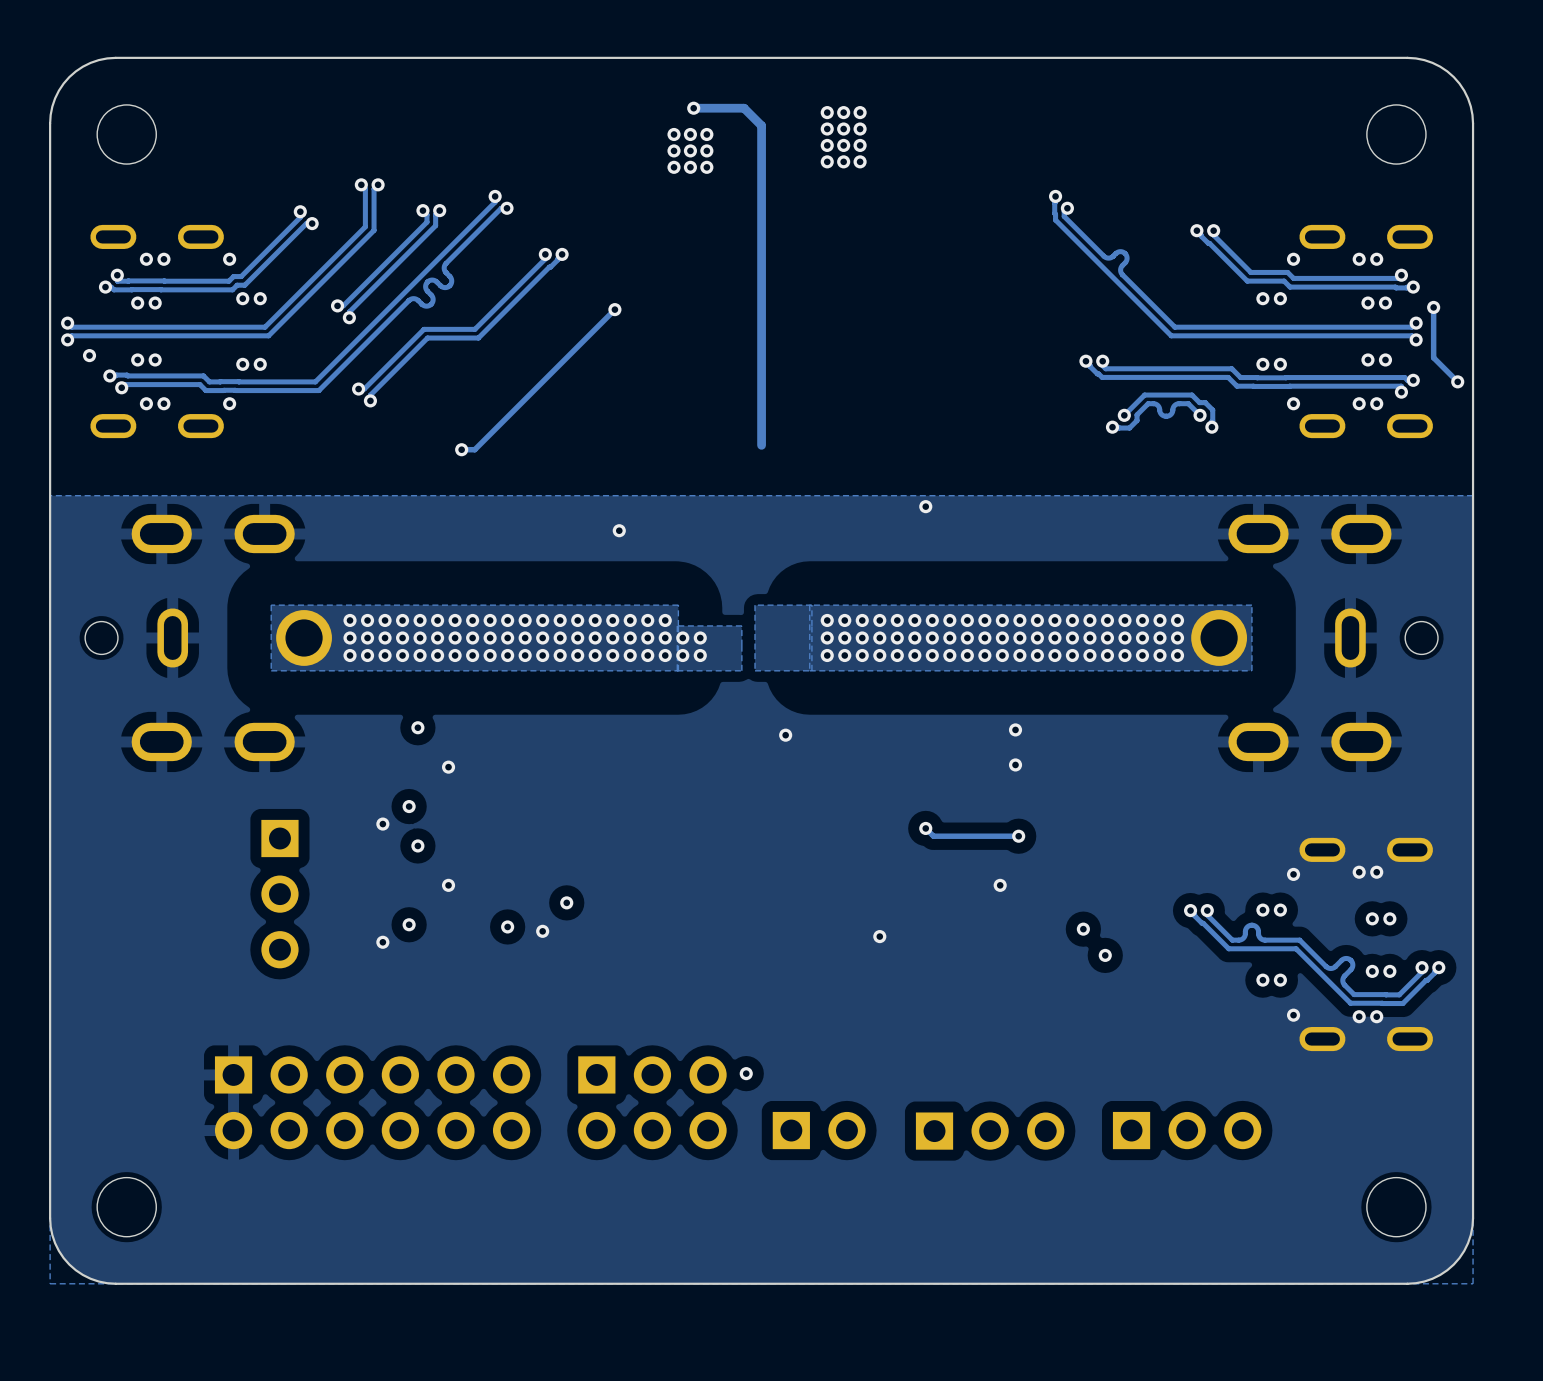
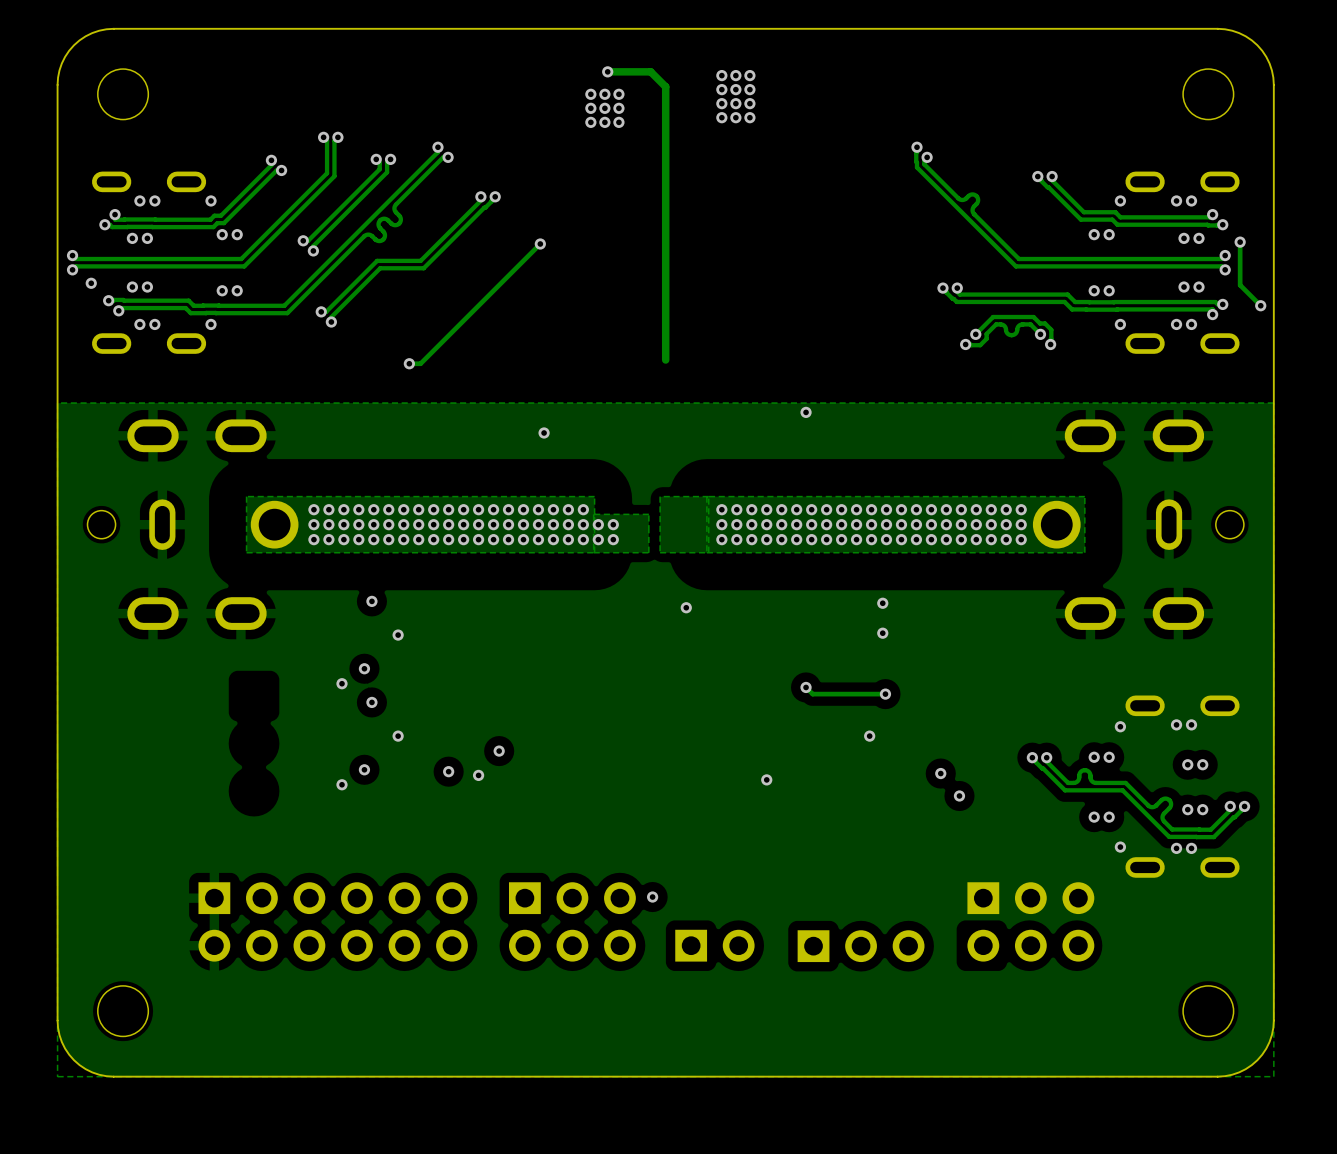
part: (279, 894) -> none
part: none -> (1030, 921)
part: (1187, 1130) -> none

